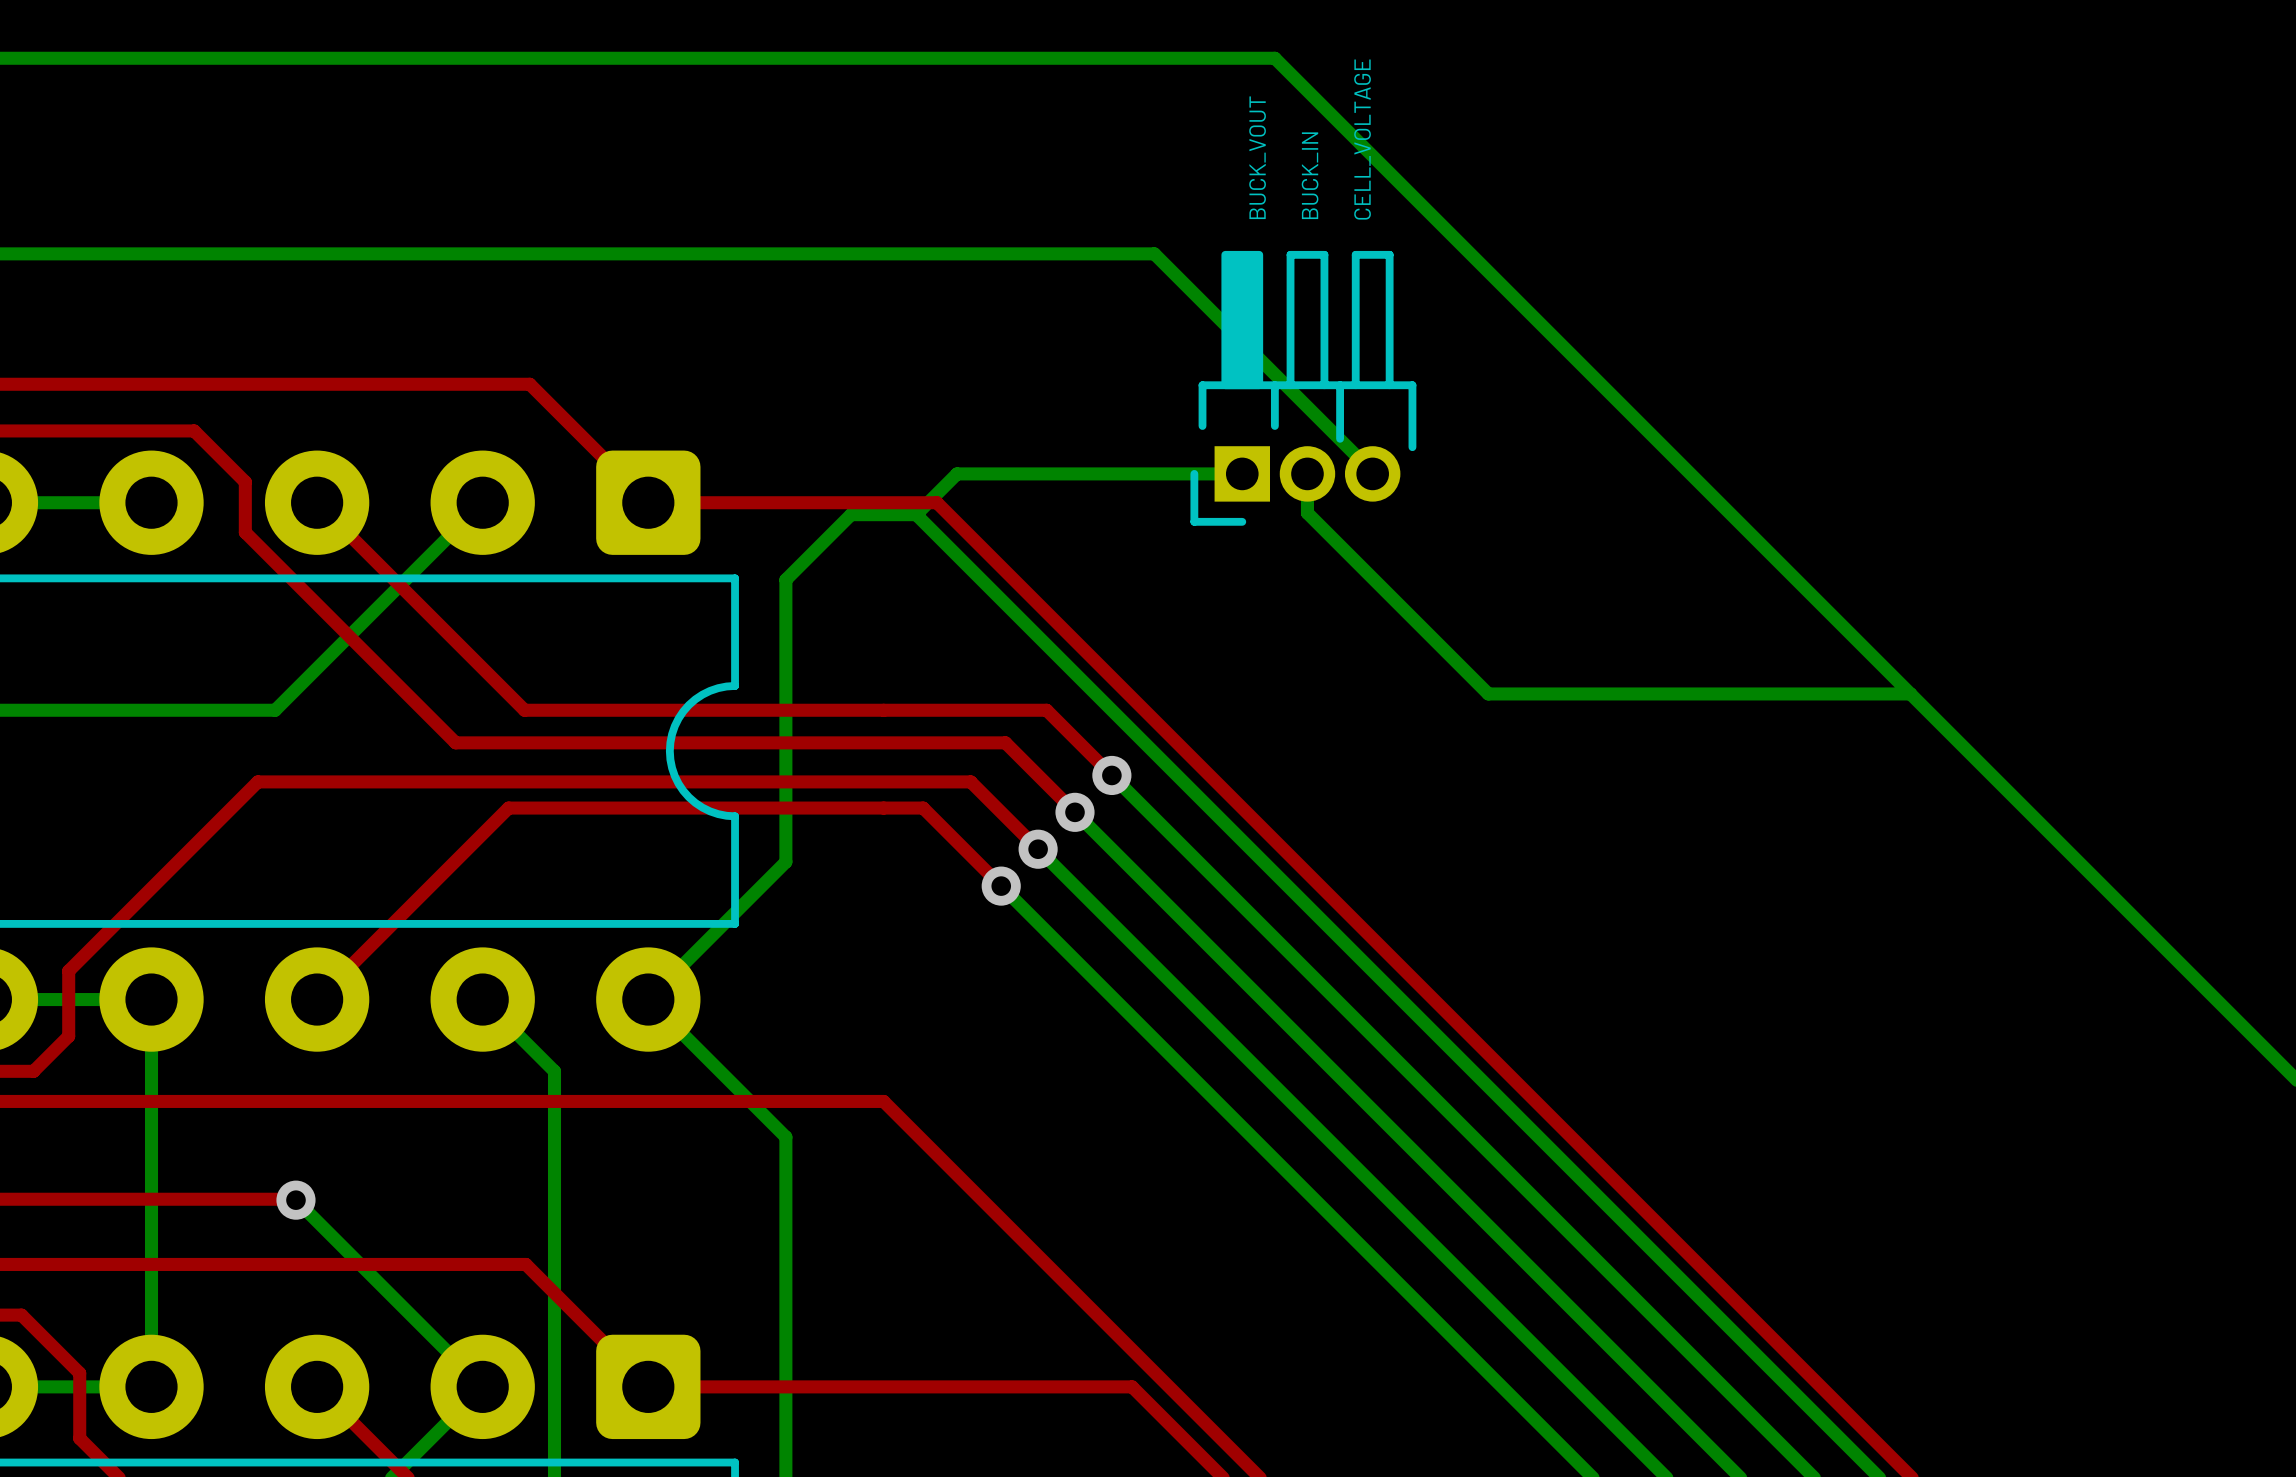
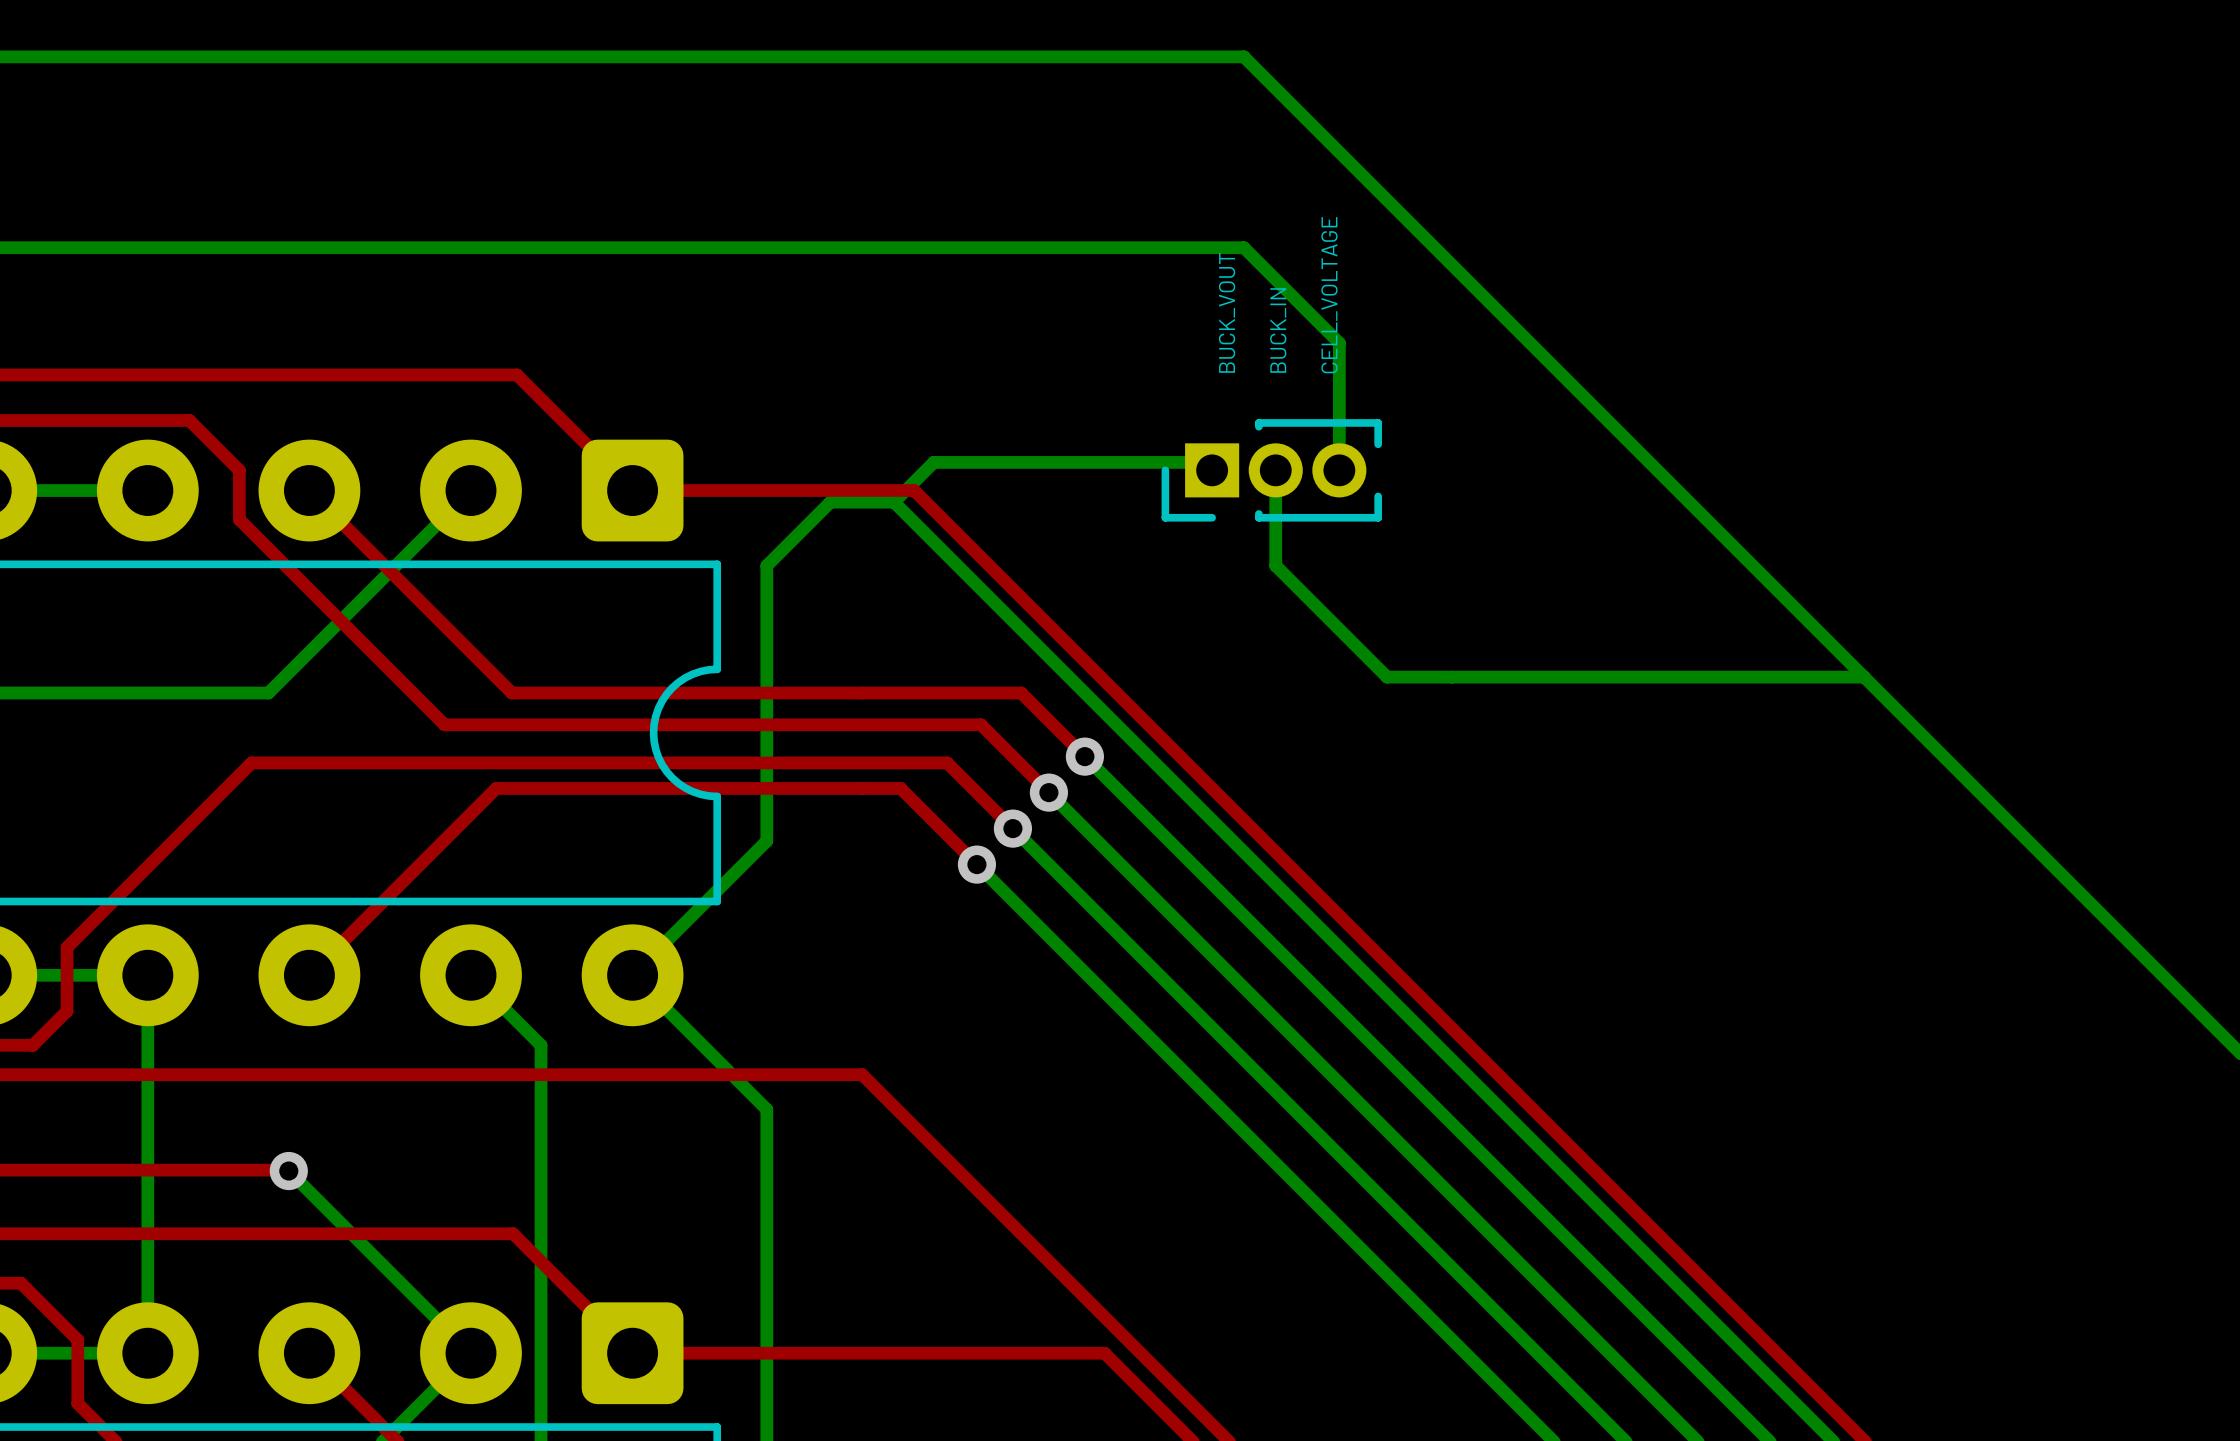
text position: CELL_VOLTAGE (1362, 139) -> CELL_VOLTAGE (1329, 295)
text position: BUCK_VOUT (1257, 157) -> BUCK_VOUT (1227, 312)
text position: BUCK_IN (1310, 175) -> BUCK_IN (1278, 330)
bottom track: (1154, 253) (1372, 472) -> (1126, 247) (1243, 247) (1339, 343) (1339, 460)
part: (1303, 388) -> none
part: none -> (1271, 470)
bottom track: (1307, 513) (1488, 693) -> (1275, 500) (1275, 565) (1387, 677) (1452, 677)

